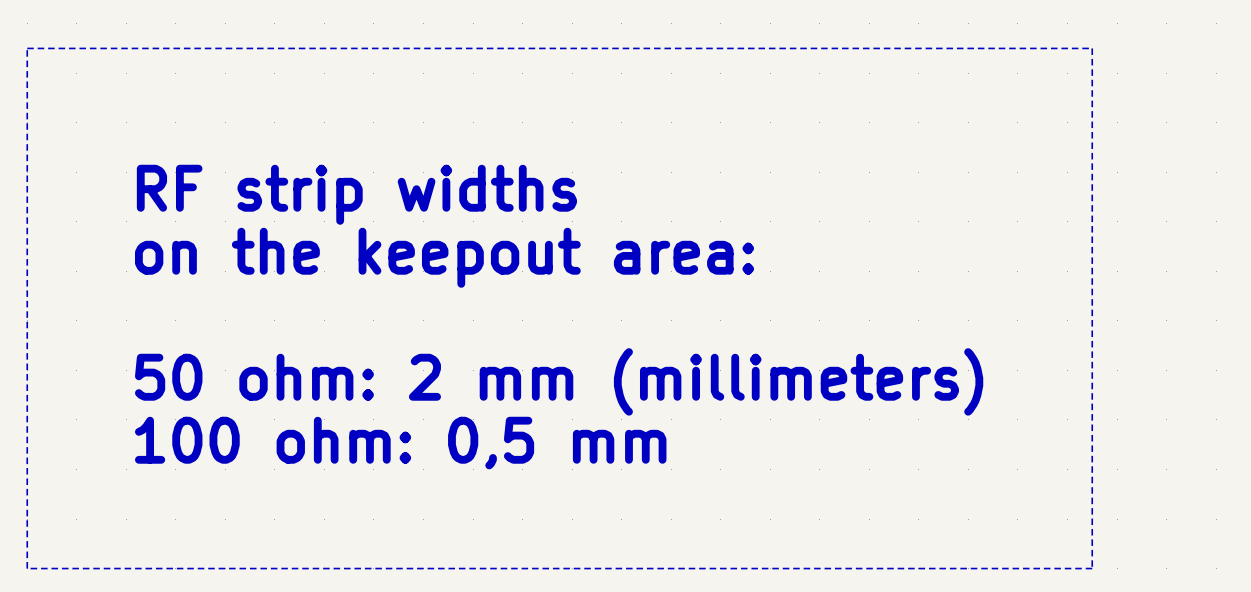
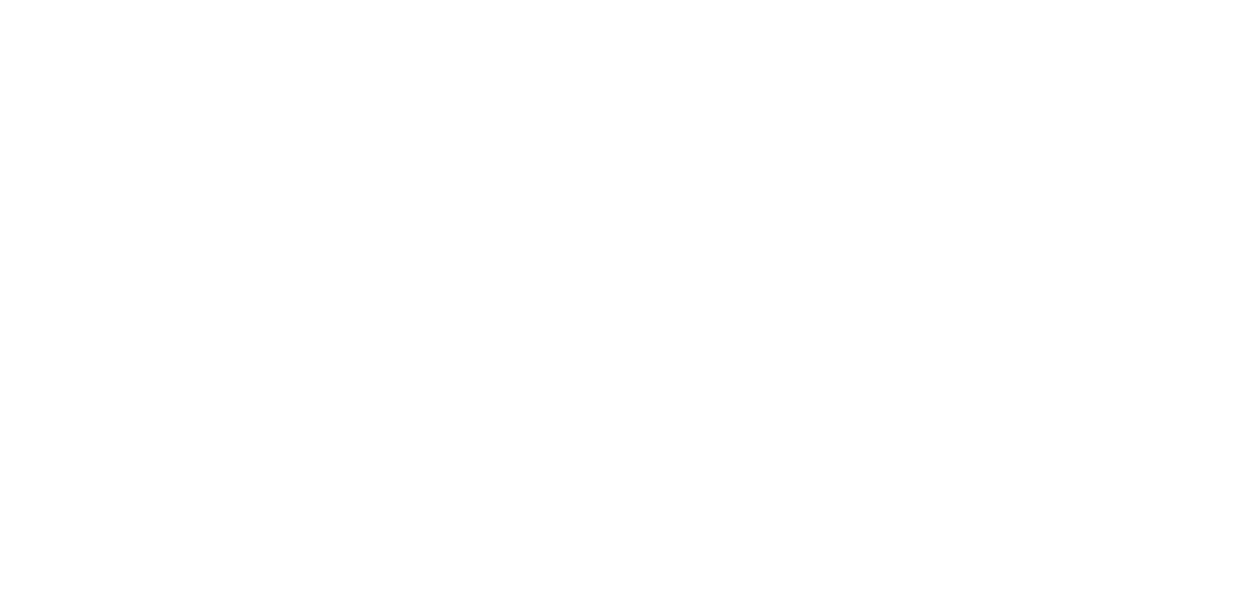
line: (27, 48) (1092, 48) (1092, 568) (27, 568) (27, 48) -> none
text: RF strip widths (356, 194) -> none
text: on the keepout area: (444, 257) -> none
text: 50 ohm: 2 mm (millimeters) (559, 381) -> none
text: 100 ohm: 0,5 mm (400, 443) -> none

